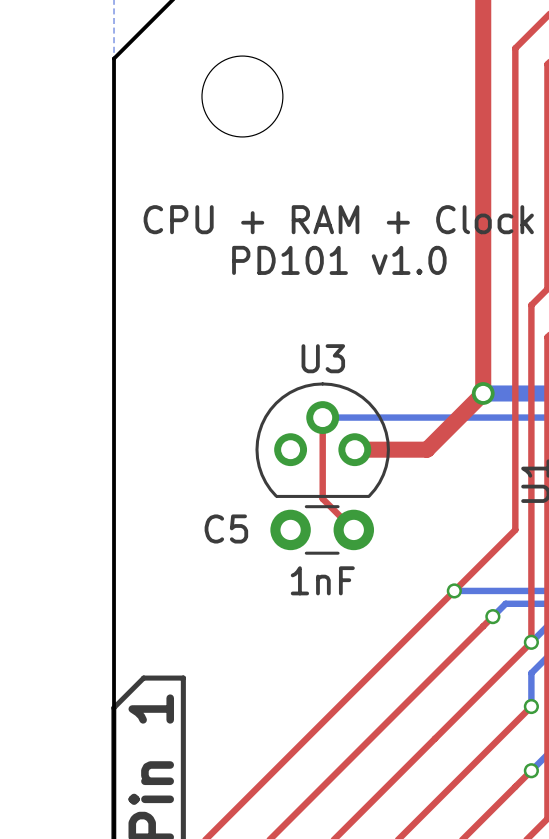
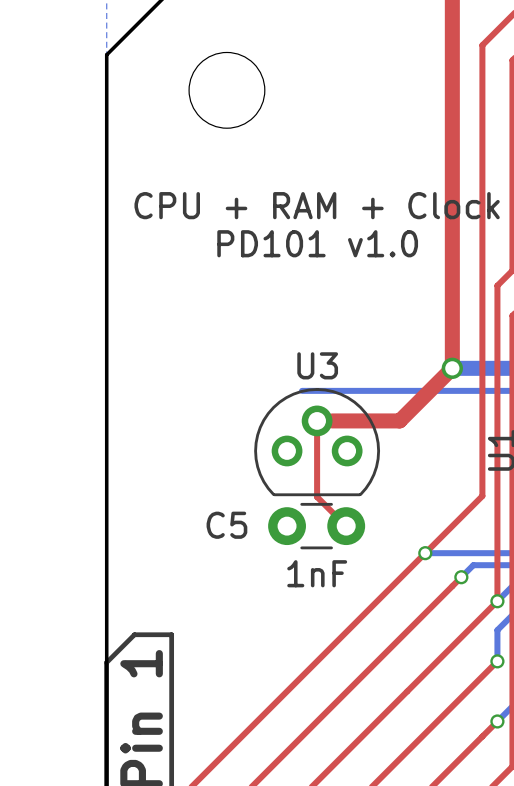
top track: (322, 417) (322, 498) (353, 529) -> (317, 420) (317, 497) (346, 526)
U3 position: (322, 440) -> (317, 442)
C5 position: (322, 529) -> (316, 526)

